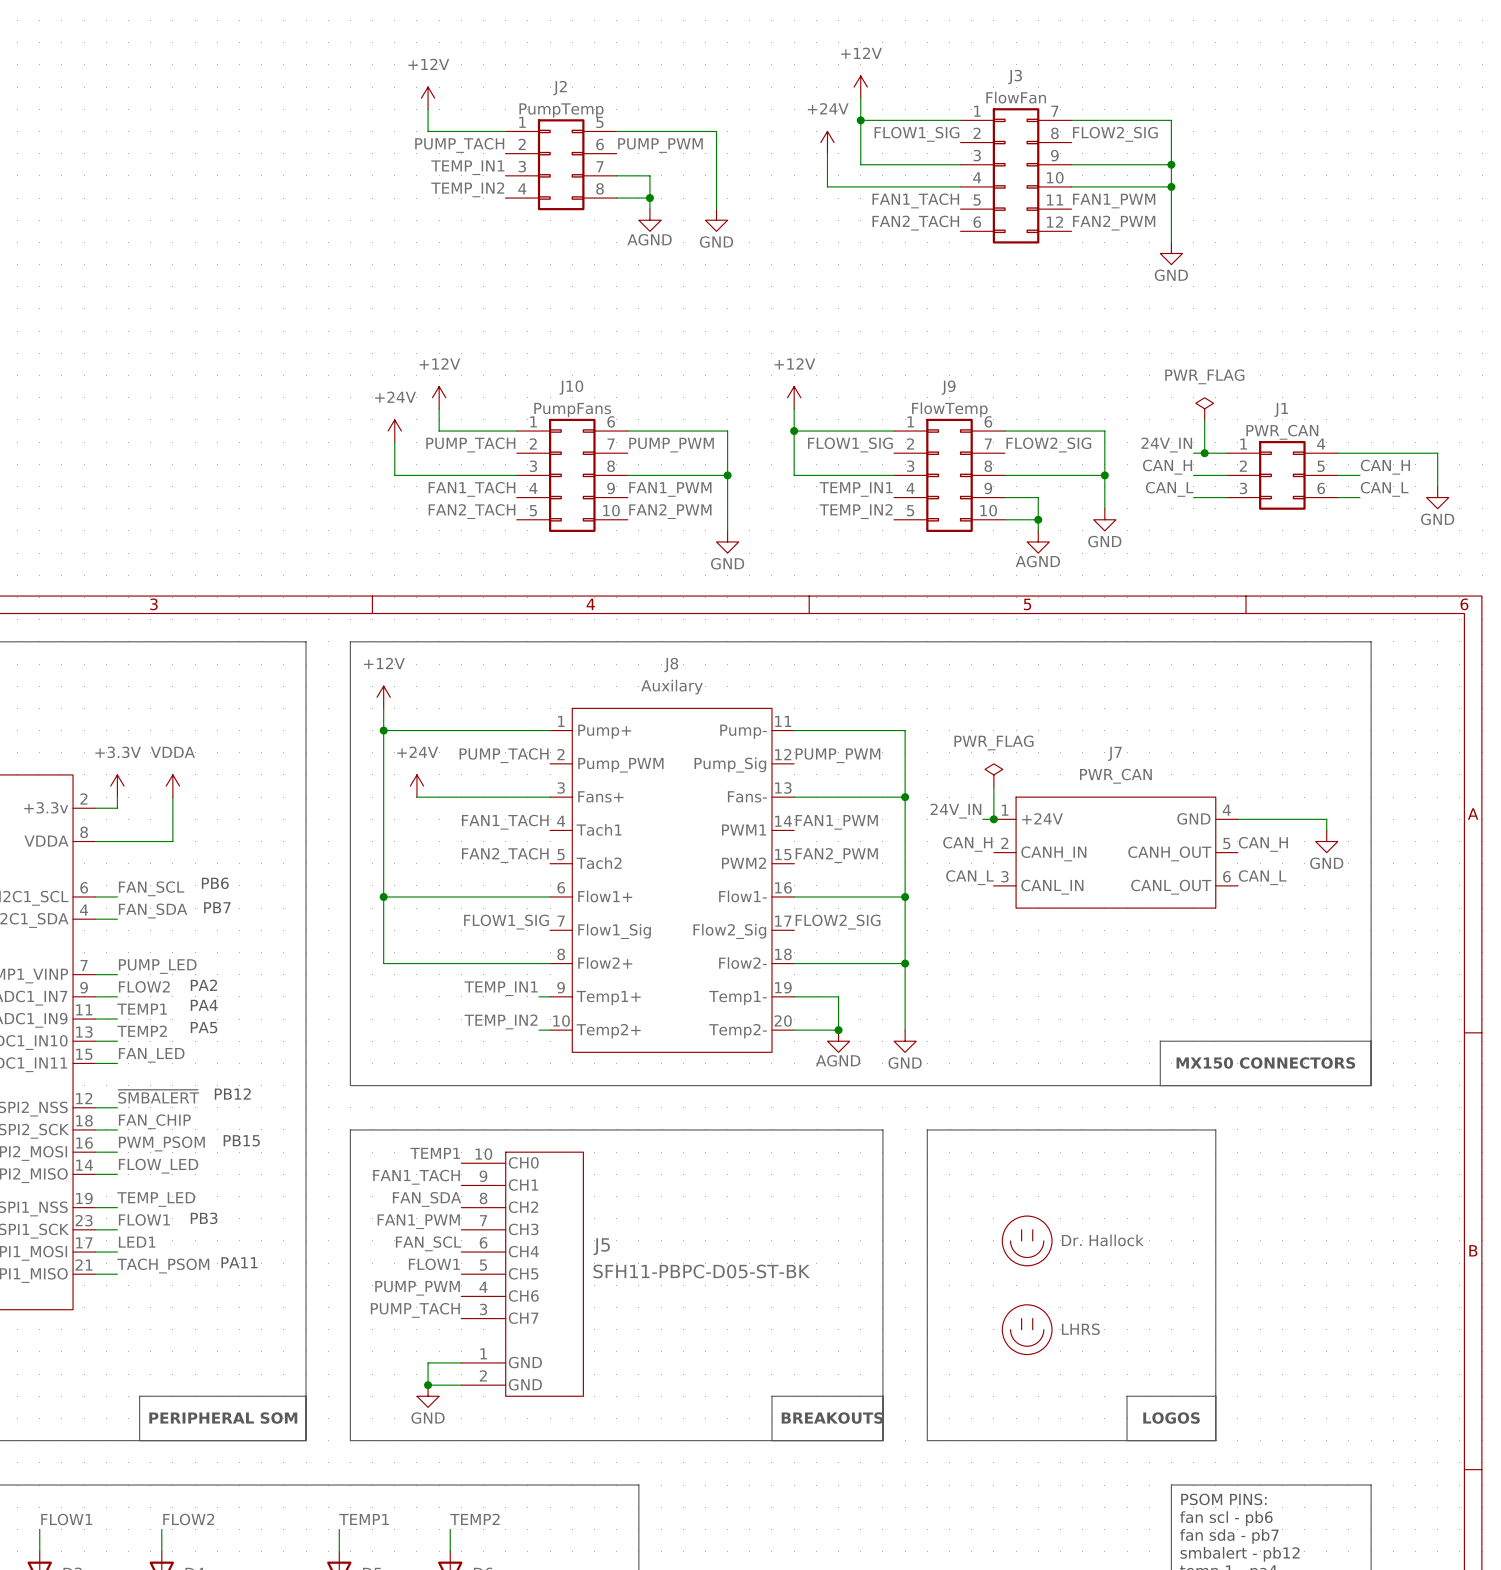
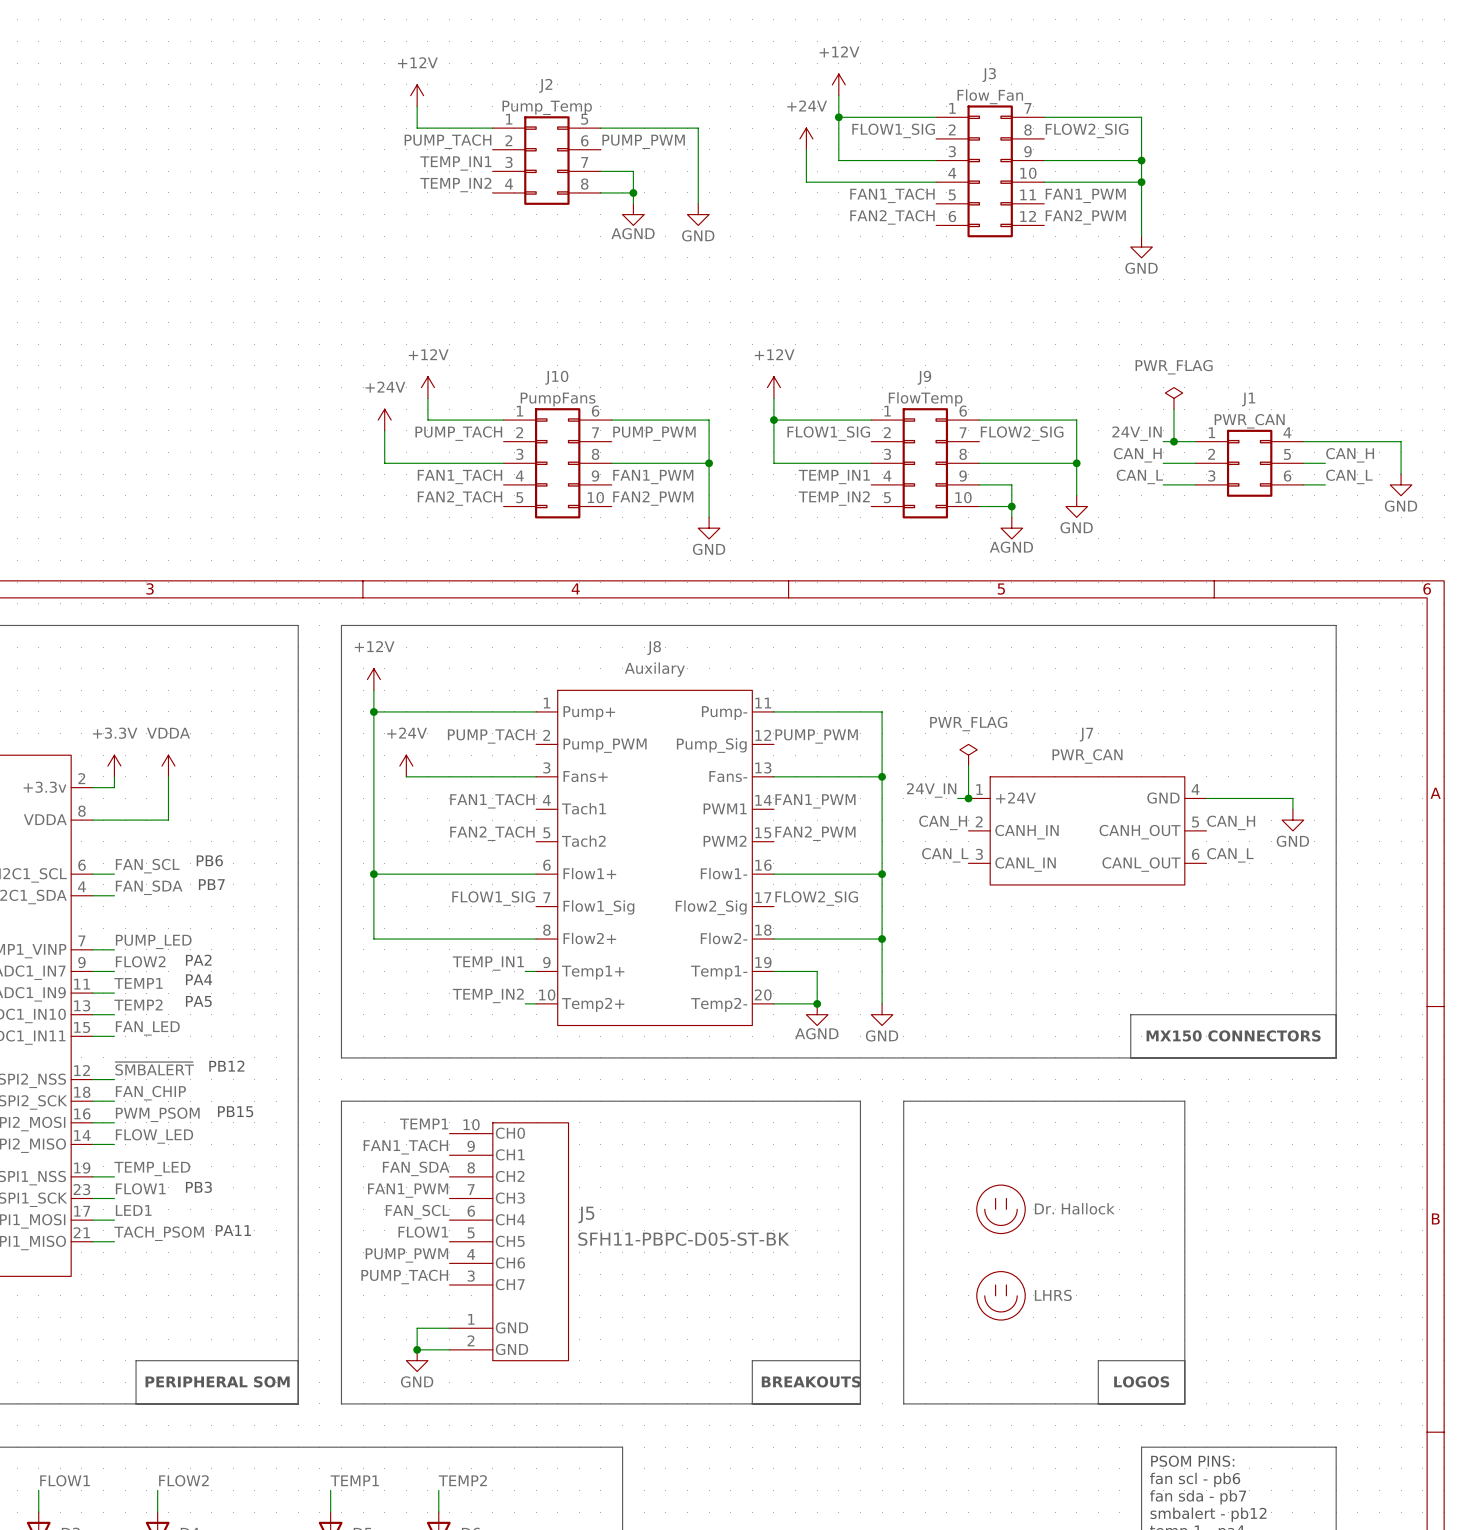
J3 value: FlowFan (1016, 97) -> Flow_Fan (990, 96)
J2 value: PumpTemp (561, 110) -> Pump_Temp (547, 107)

